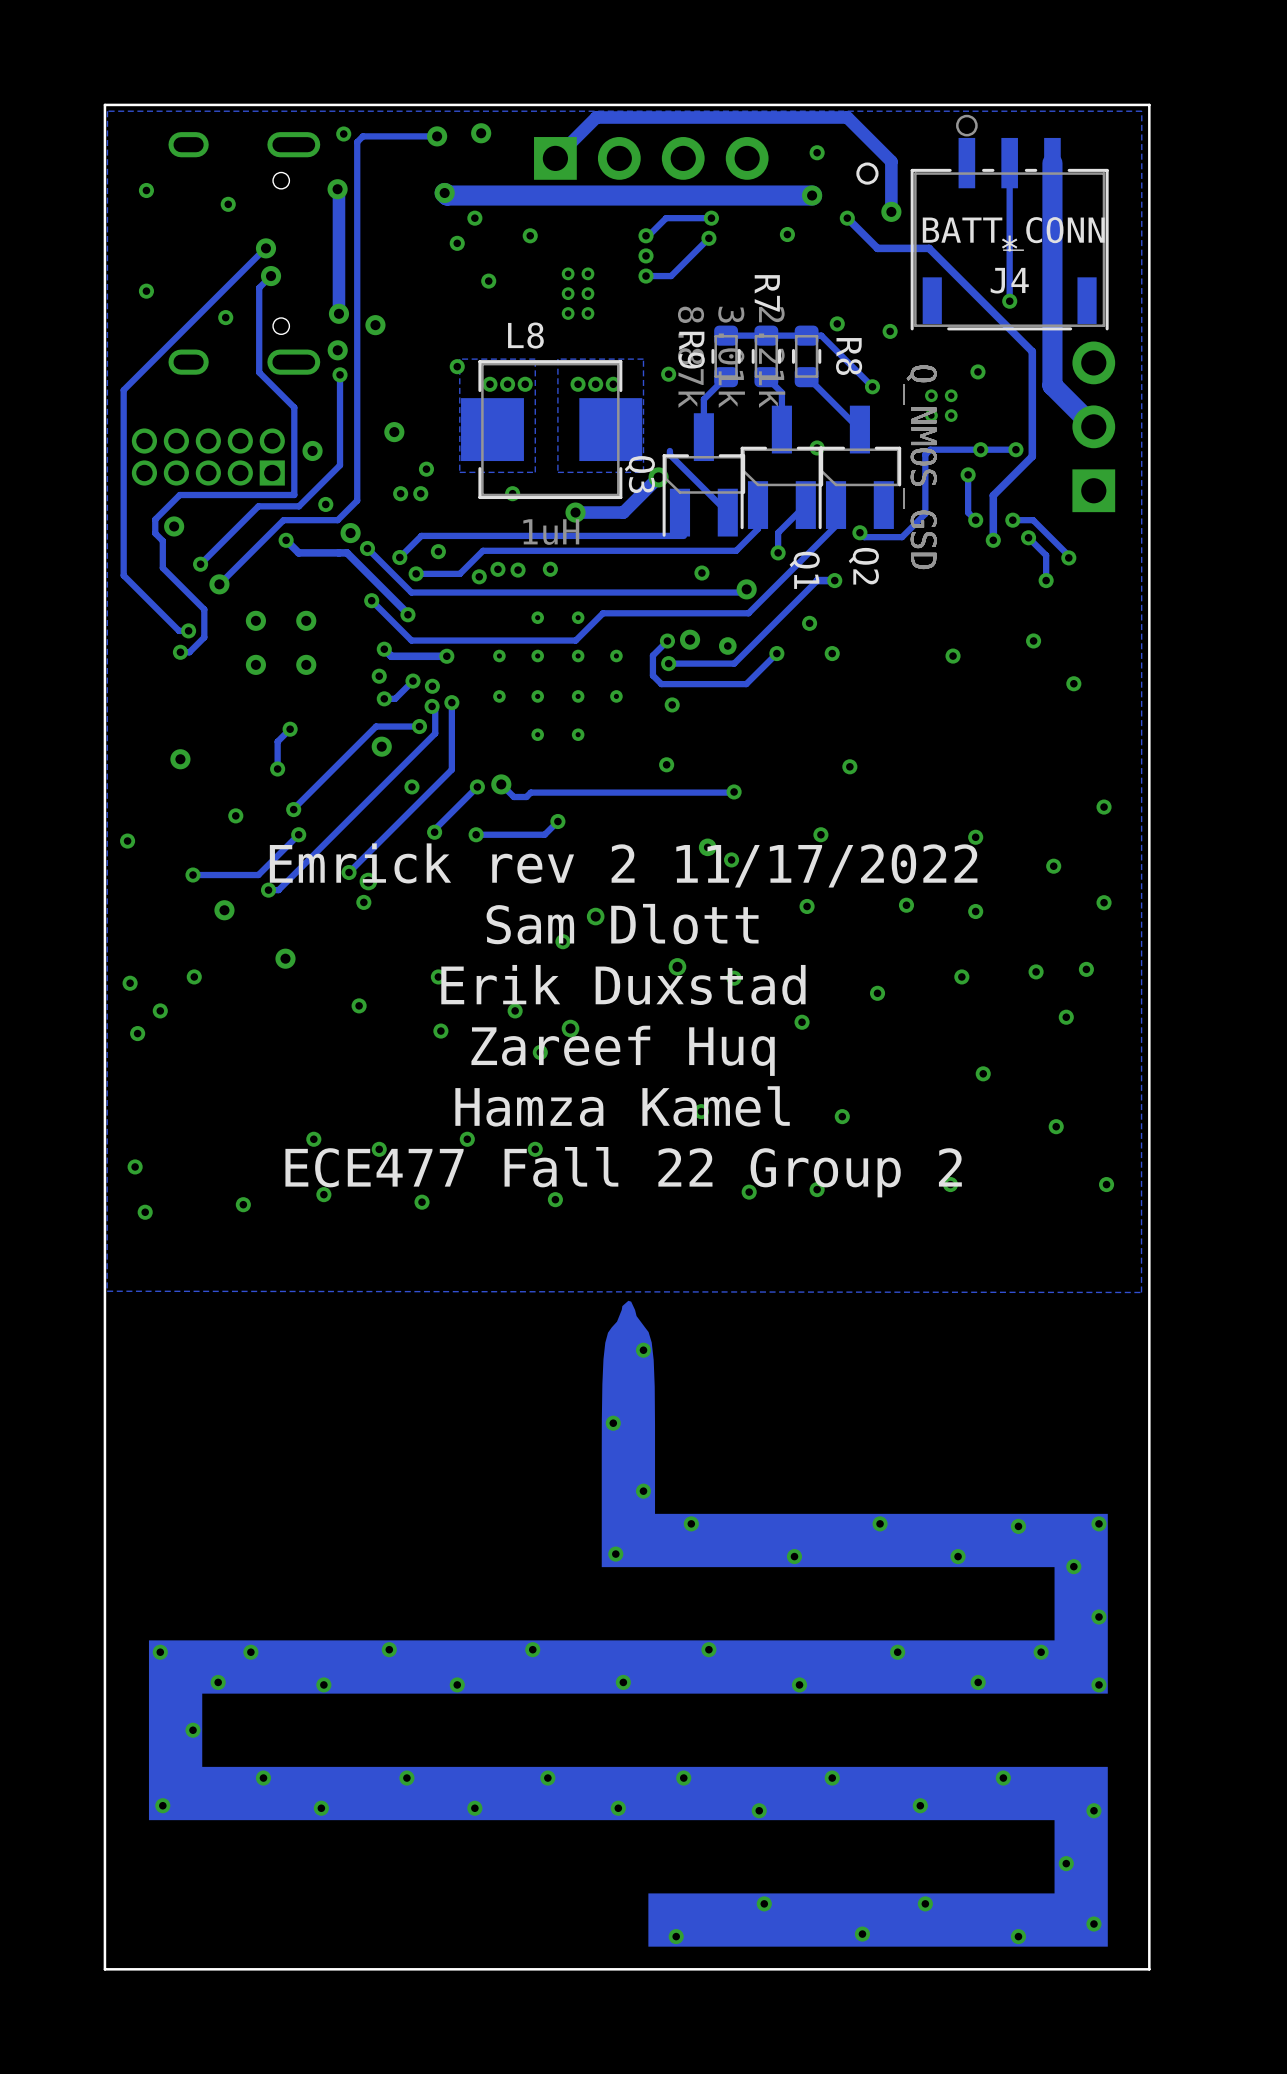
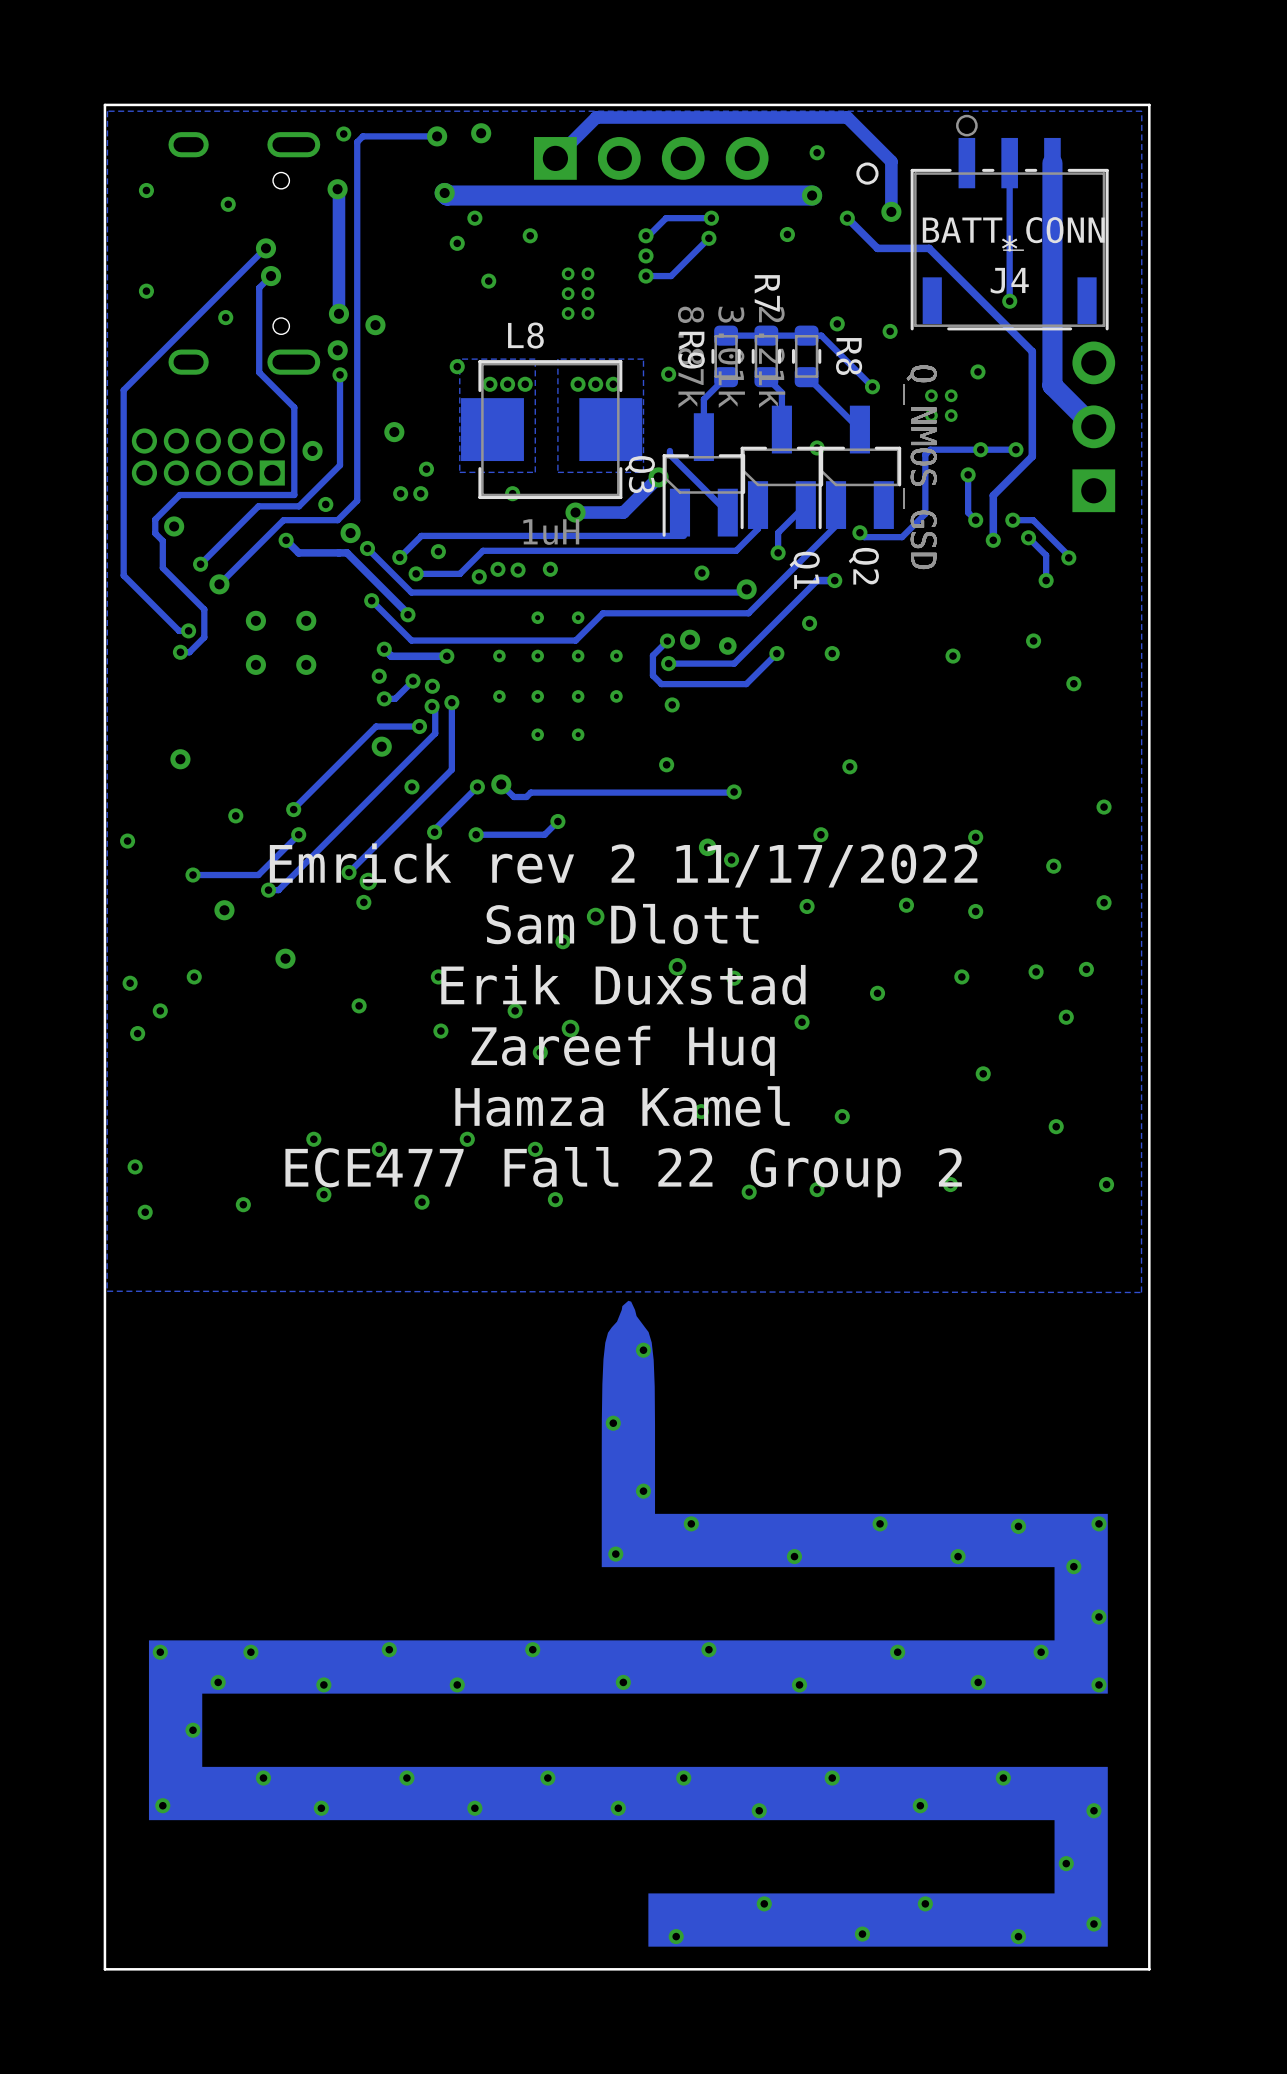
track: (290, 729) (277, 741) (277, 769) -> none
via: (290, 729) -> none
via: (277, 769) -> none

